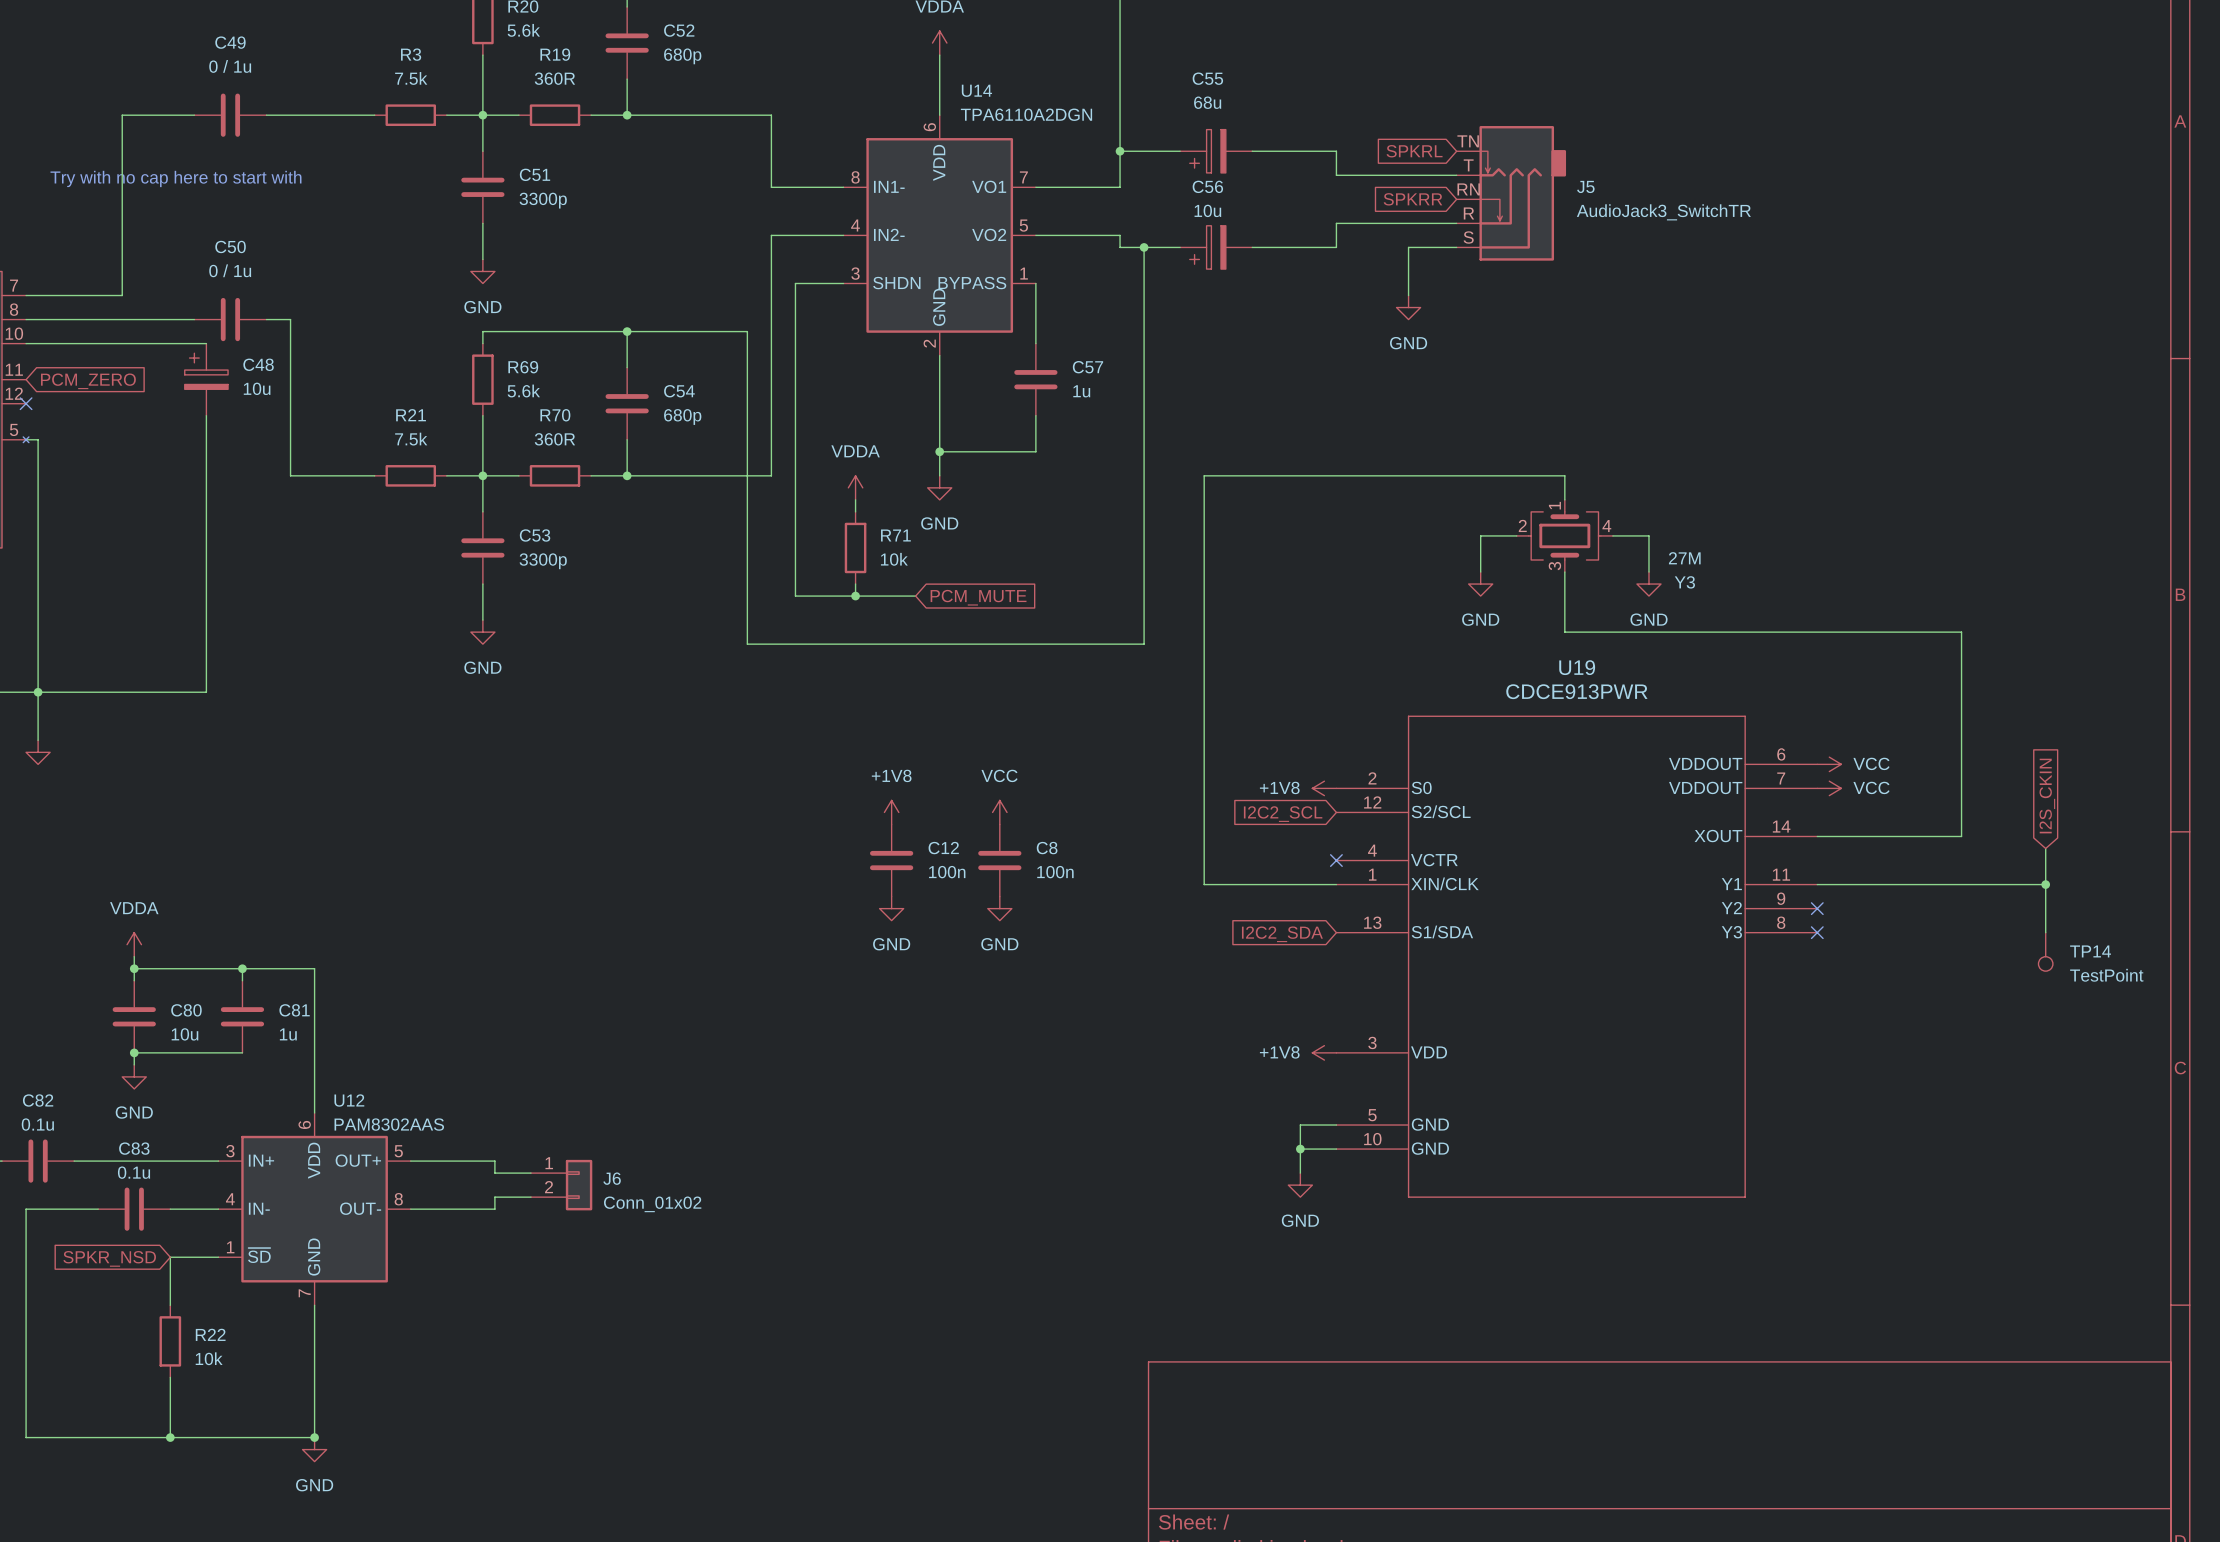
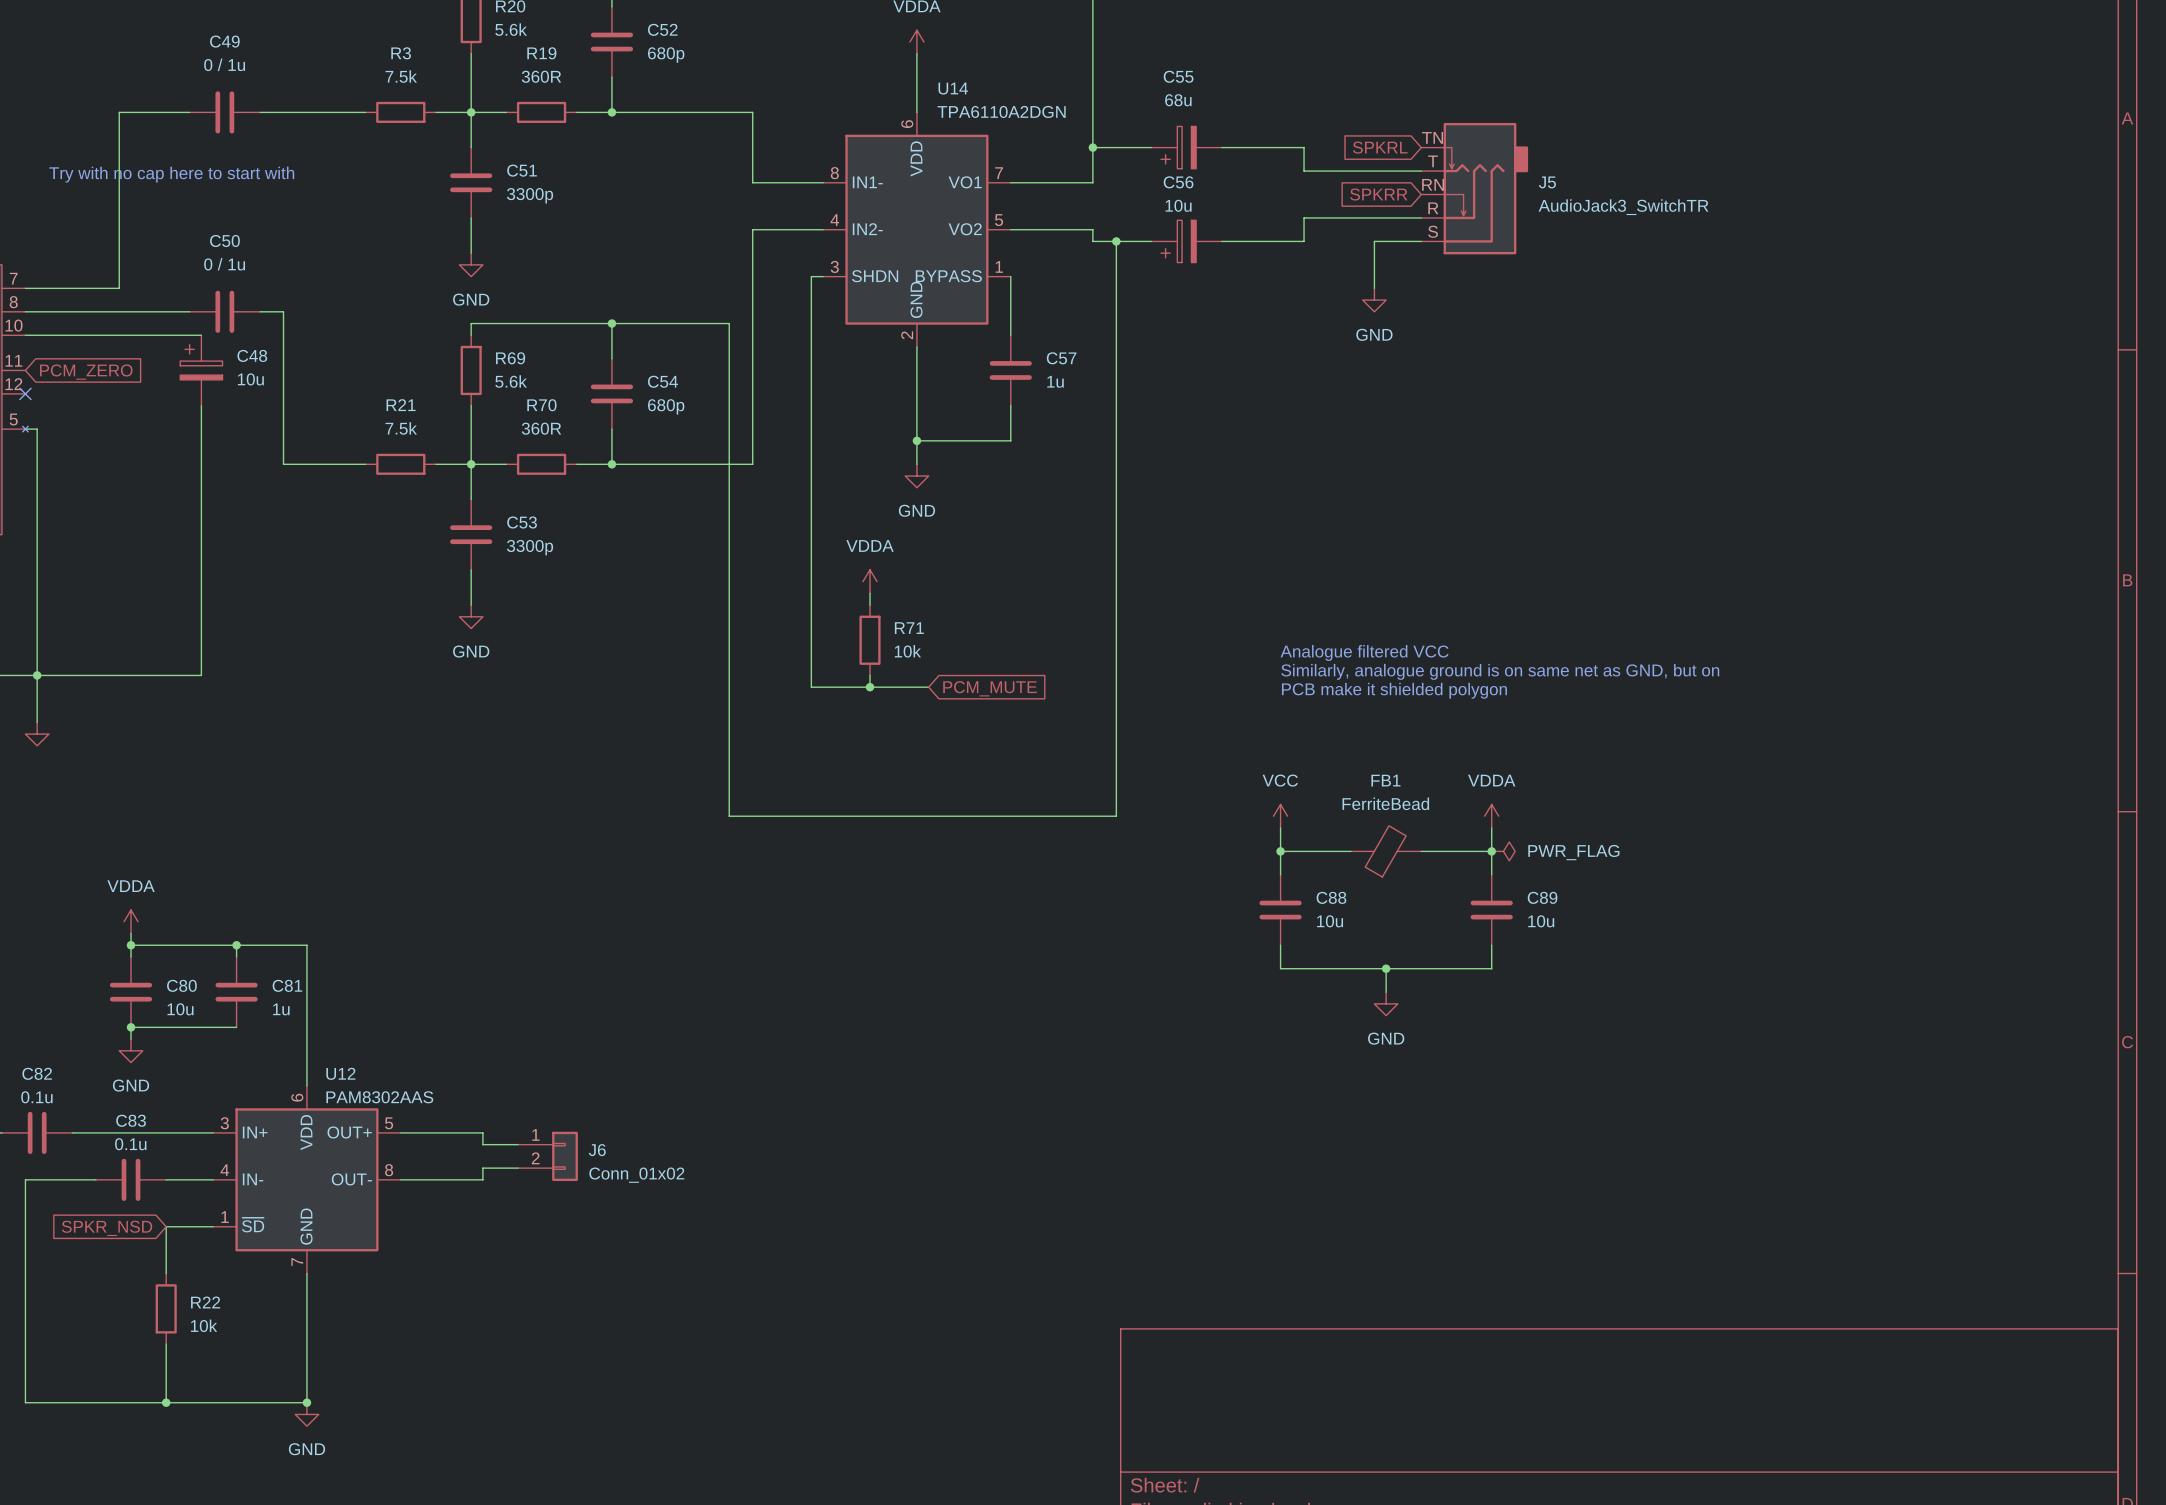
wire: (831, 283) (795, 283) (795, 596) (915, 596) -> (811, 276) (811, 687) (928, 687)
power symbol position: VDDA (855, 487) -> VDDA (870, 581)
wire: (855, 499) (855, 511) -> (870, 593) (870, 605)
wire: (1564, 499) (1564, 475) (1204, 475) (1204, 884) (1336, 884) -> none
wire: (1516, 535) (1480, 535) (1480, 572) -> none
Y3: 27M (1564, 535) -> none
wire: (1612, 535) (1648, 535) (1648, 572) -> none
R71 position: (855, 547) -> (870, 640)
wire: (1564, 572) (1564, 632) (1961, 632) (1961, 836) (1817, 836) -> none
wire: (855, 584) (855, 596) -> (870, 675) (870, 687)
power symbol: GND (1480, 584) -> none
power symbol: GND (1648, 584) -> none
junction: (855, 596) -> none
global label position: PCM_MUTE (978, 597) -> PCM_MUTE (990, 688)
wire: (747, 644) (1144, 644) -> (729, 628) (729, 816) (1116, 816) (1116, 628)
text: none -> Analogue filtered VCC (1364, 652)
text: none -> Similarly, analogue ground is on same net as GND, but on (1500, 671)
junction: none -> (870, 687)
text: none -> PCB make it shielded polygon (1394, 690)
power symbol: VCC (1829, 764) -> none
power symbol: +1V8 (1324, 788) -> none
power symbol: VCC (1829, 788) -> none
global label: I2S_CKIN (2047, 796) -> none
power symbol: +1V8 (891, 812) -> none
power symbol: VCC (999, 812) -> none
global label: I2C2_SCL (1283, 814) -> none
power symbol: none -> VCC (1280, 816)
power symbol: none -> VDDA (1491, 816)
wire: none -> (1280, 827) (1280, 874)
wire: none -> (1491, 827) (1491, 874)
wire: (2045, 848) (2045, 932) -> none
C12: 100n (891, 860) -> none
C8: 100n (999, 860) -> none
no-connect mark: (1336, 860) -> none
wire: none -> (1280, 851) (1350, 851)
junction: none -> (1280, 851)
FB1: none -> FerriteBead (1386, 851)
wire: none -> (1421, 851) (1491, 851)
junction: none -> (1491, 851)
power symbol: none -> PWR_FLAG (1503, 851)
wire: (1817, 884) (2045, 884) -> none
junction: (2045, 884) -> none
power symbol: GND (891, 908) -> none
power symbol: GND (999, 908) -> none
no-connect mark: (1817, 908) -> none
C88: none -> 10u (1280, 910)
C89: none -> 10u (1491, 910)
no-connect mark: (1817, 932) -> none
global label: I2C2_SDA (1282, 934) -> none
TP14: TestPoint (2045, 951) -> none
U19: CDCE913PWR (1576, 956) -> none
wire: none -> (1280, 945) (1280, 968) (1491, 968) (1491, 945)
wire: none -> (1386, 968) (1386, 992)
junction: none -> (1386, 968)
power symbol: +1V8 (1324, 1052) -> none
wire: (1336, 1125) (1300, 1125) (1300, 1173) -> none
wire: (1300, 1149) (1336, 1149) -> none
junction: (1300, 1149) -> none
power symbol position: GND (1300, 1185) -> GND (1386, 1003)

